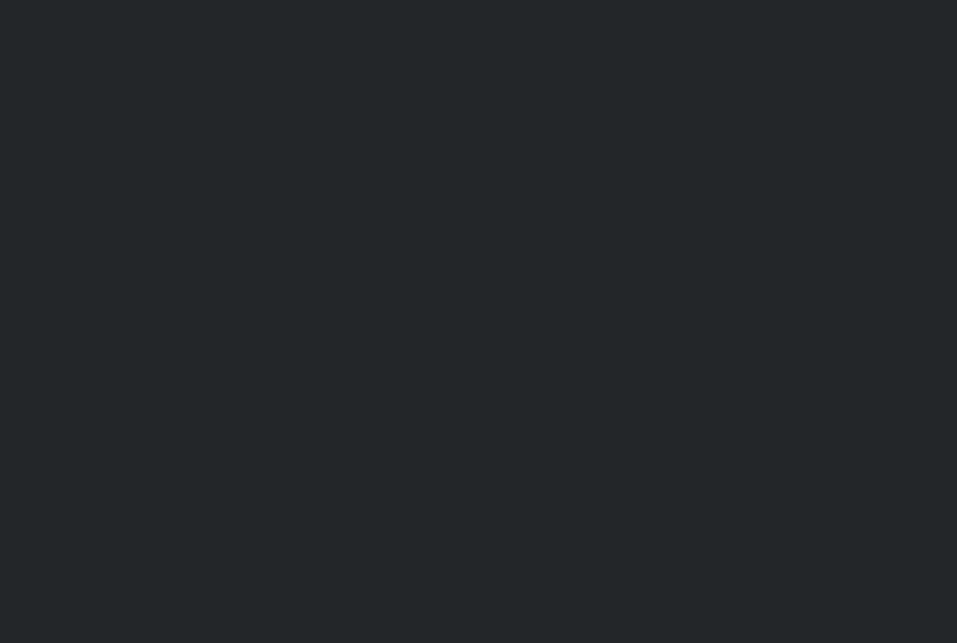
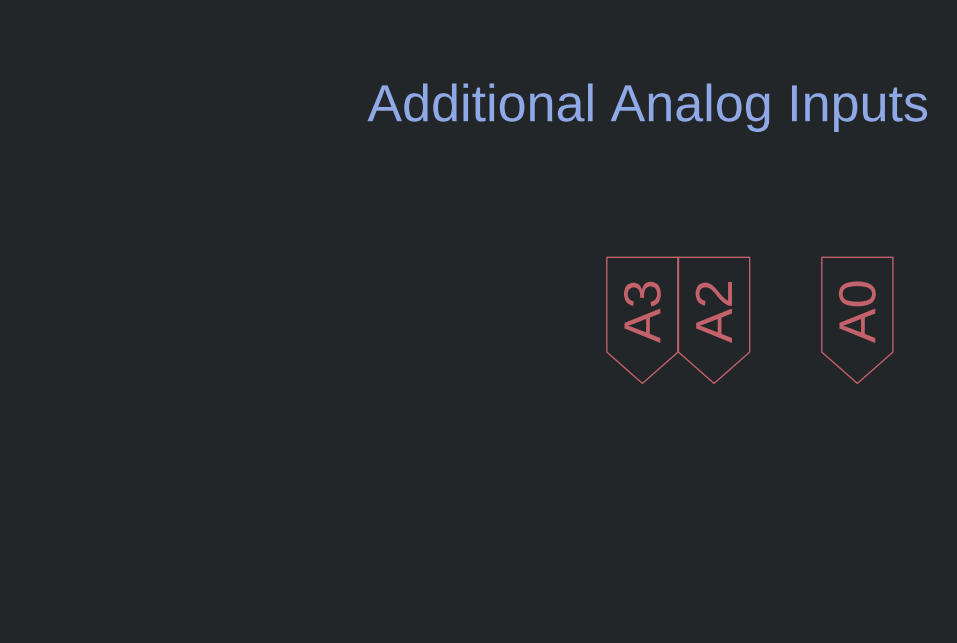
text: none -> Additional Analog Inputs (647, 107)
global label: none -> A3 (642, 312)
global label: none -> A2 (713, 312)
global label: none -> A0 (857, 312)

